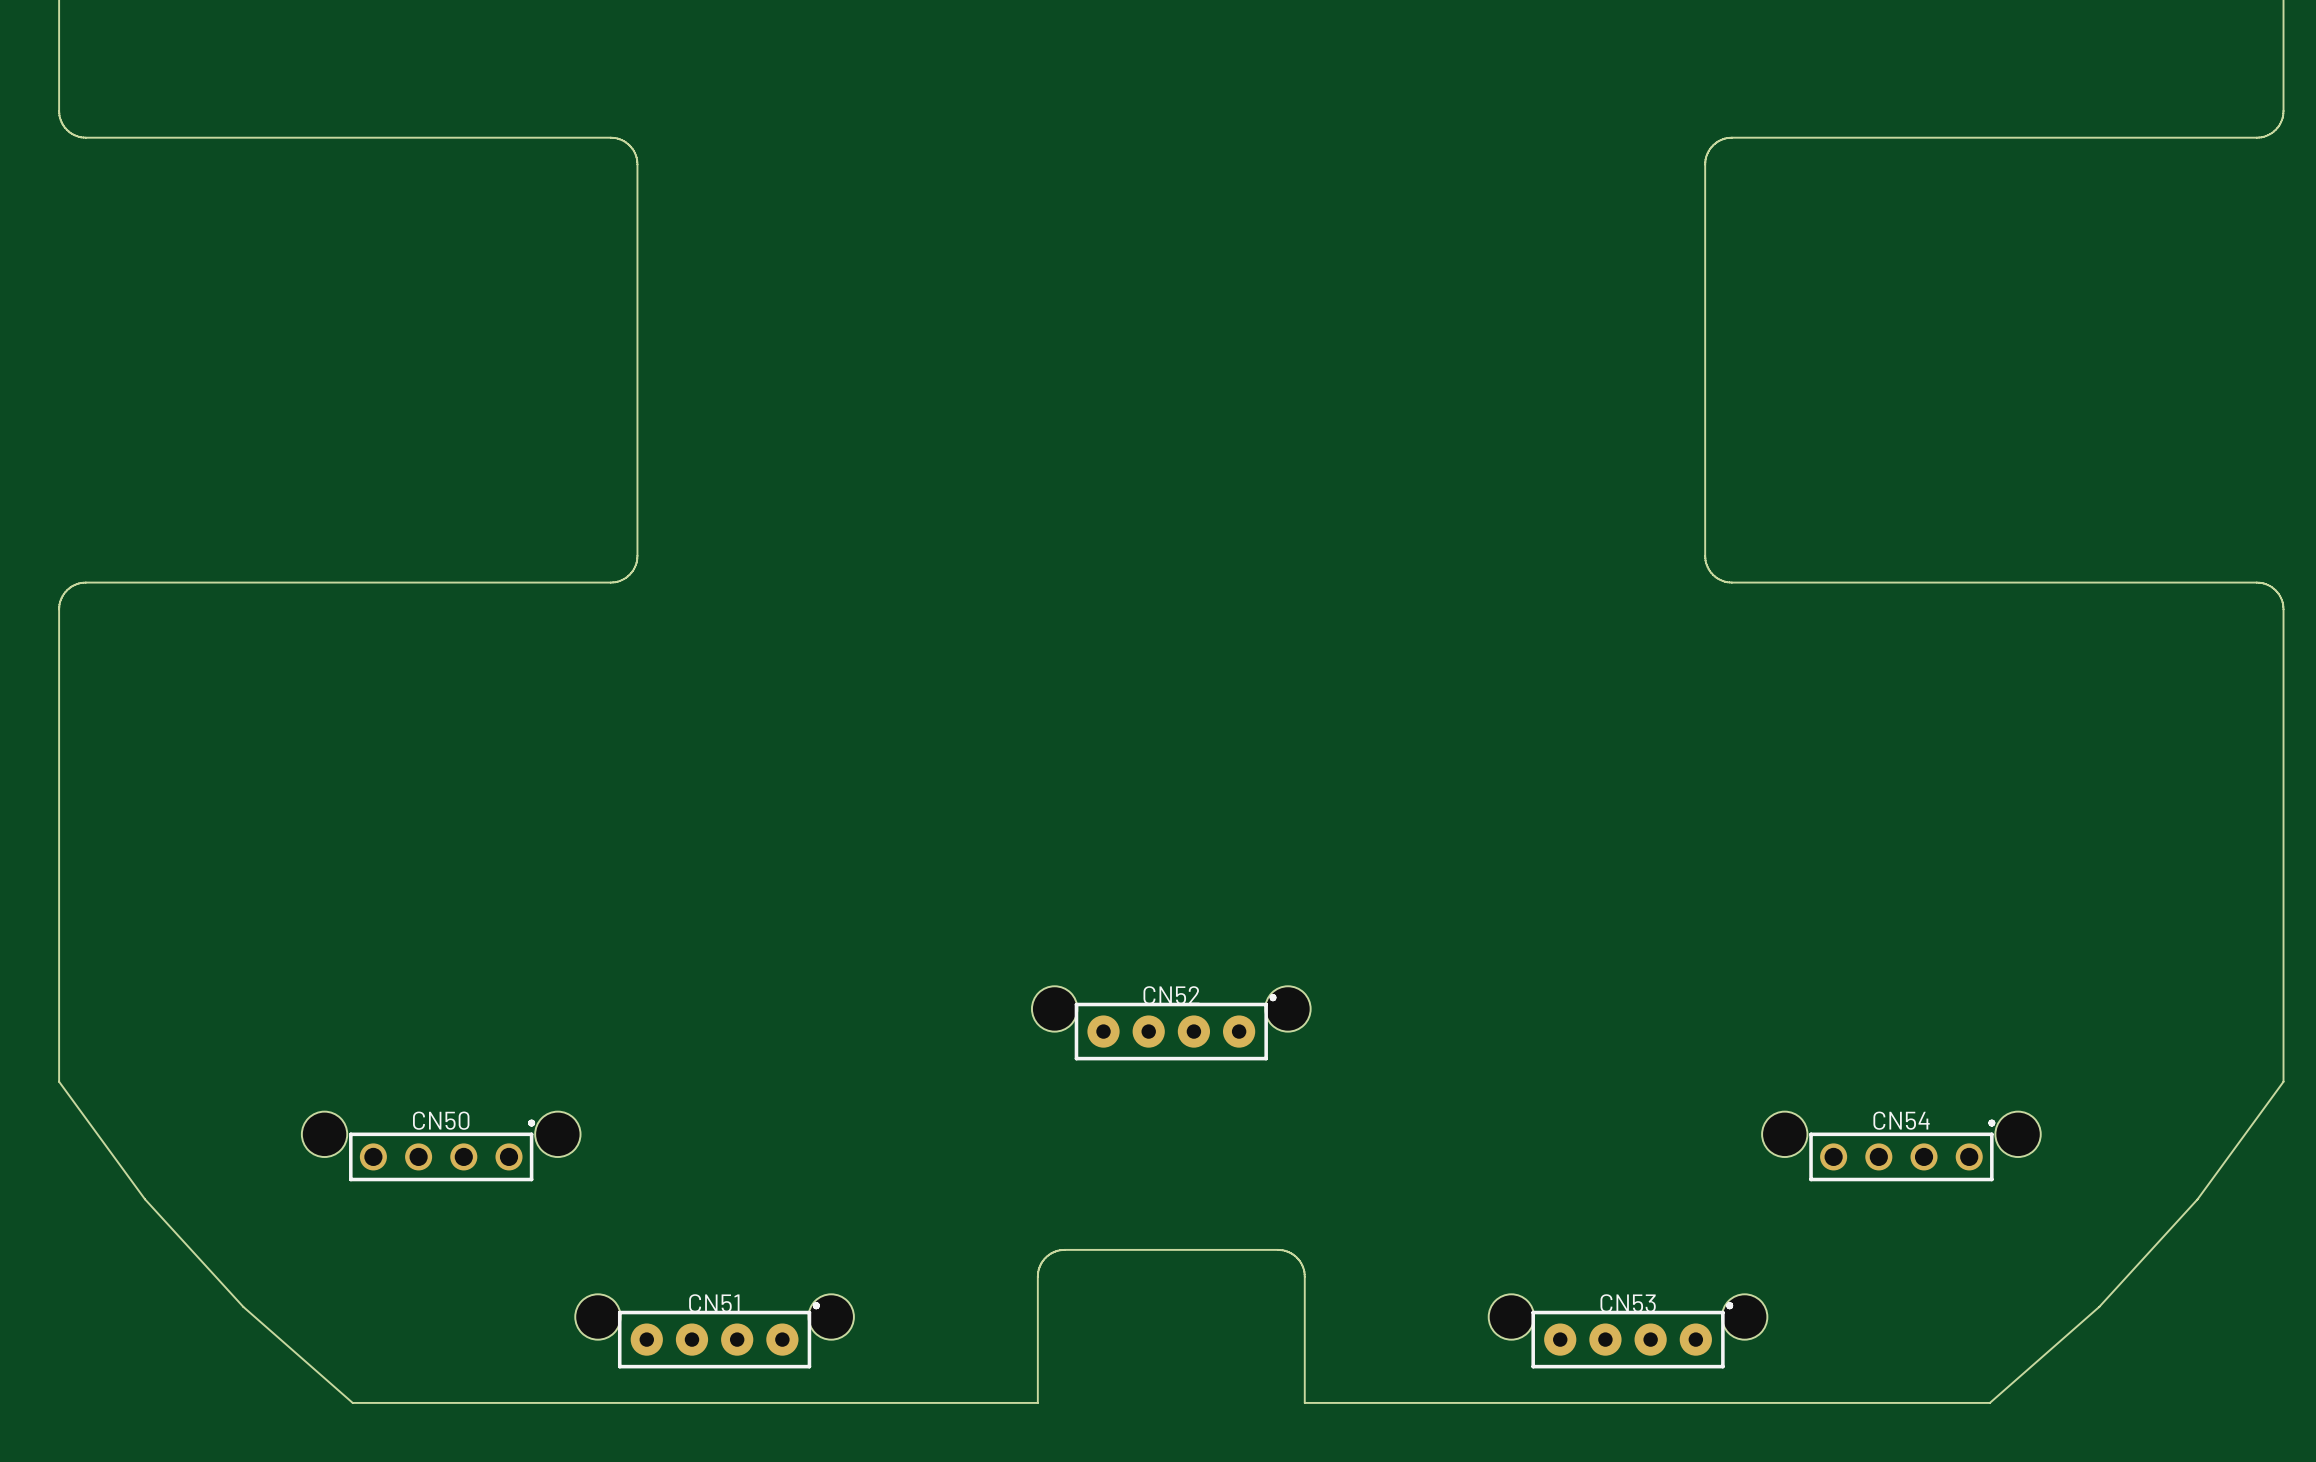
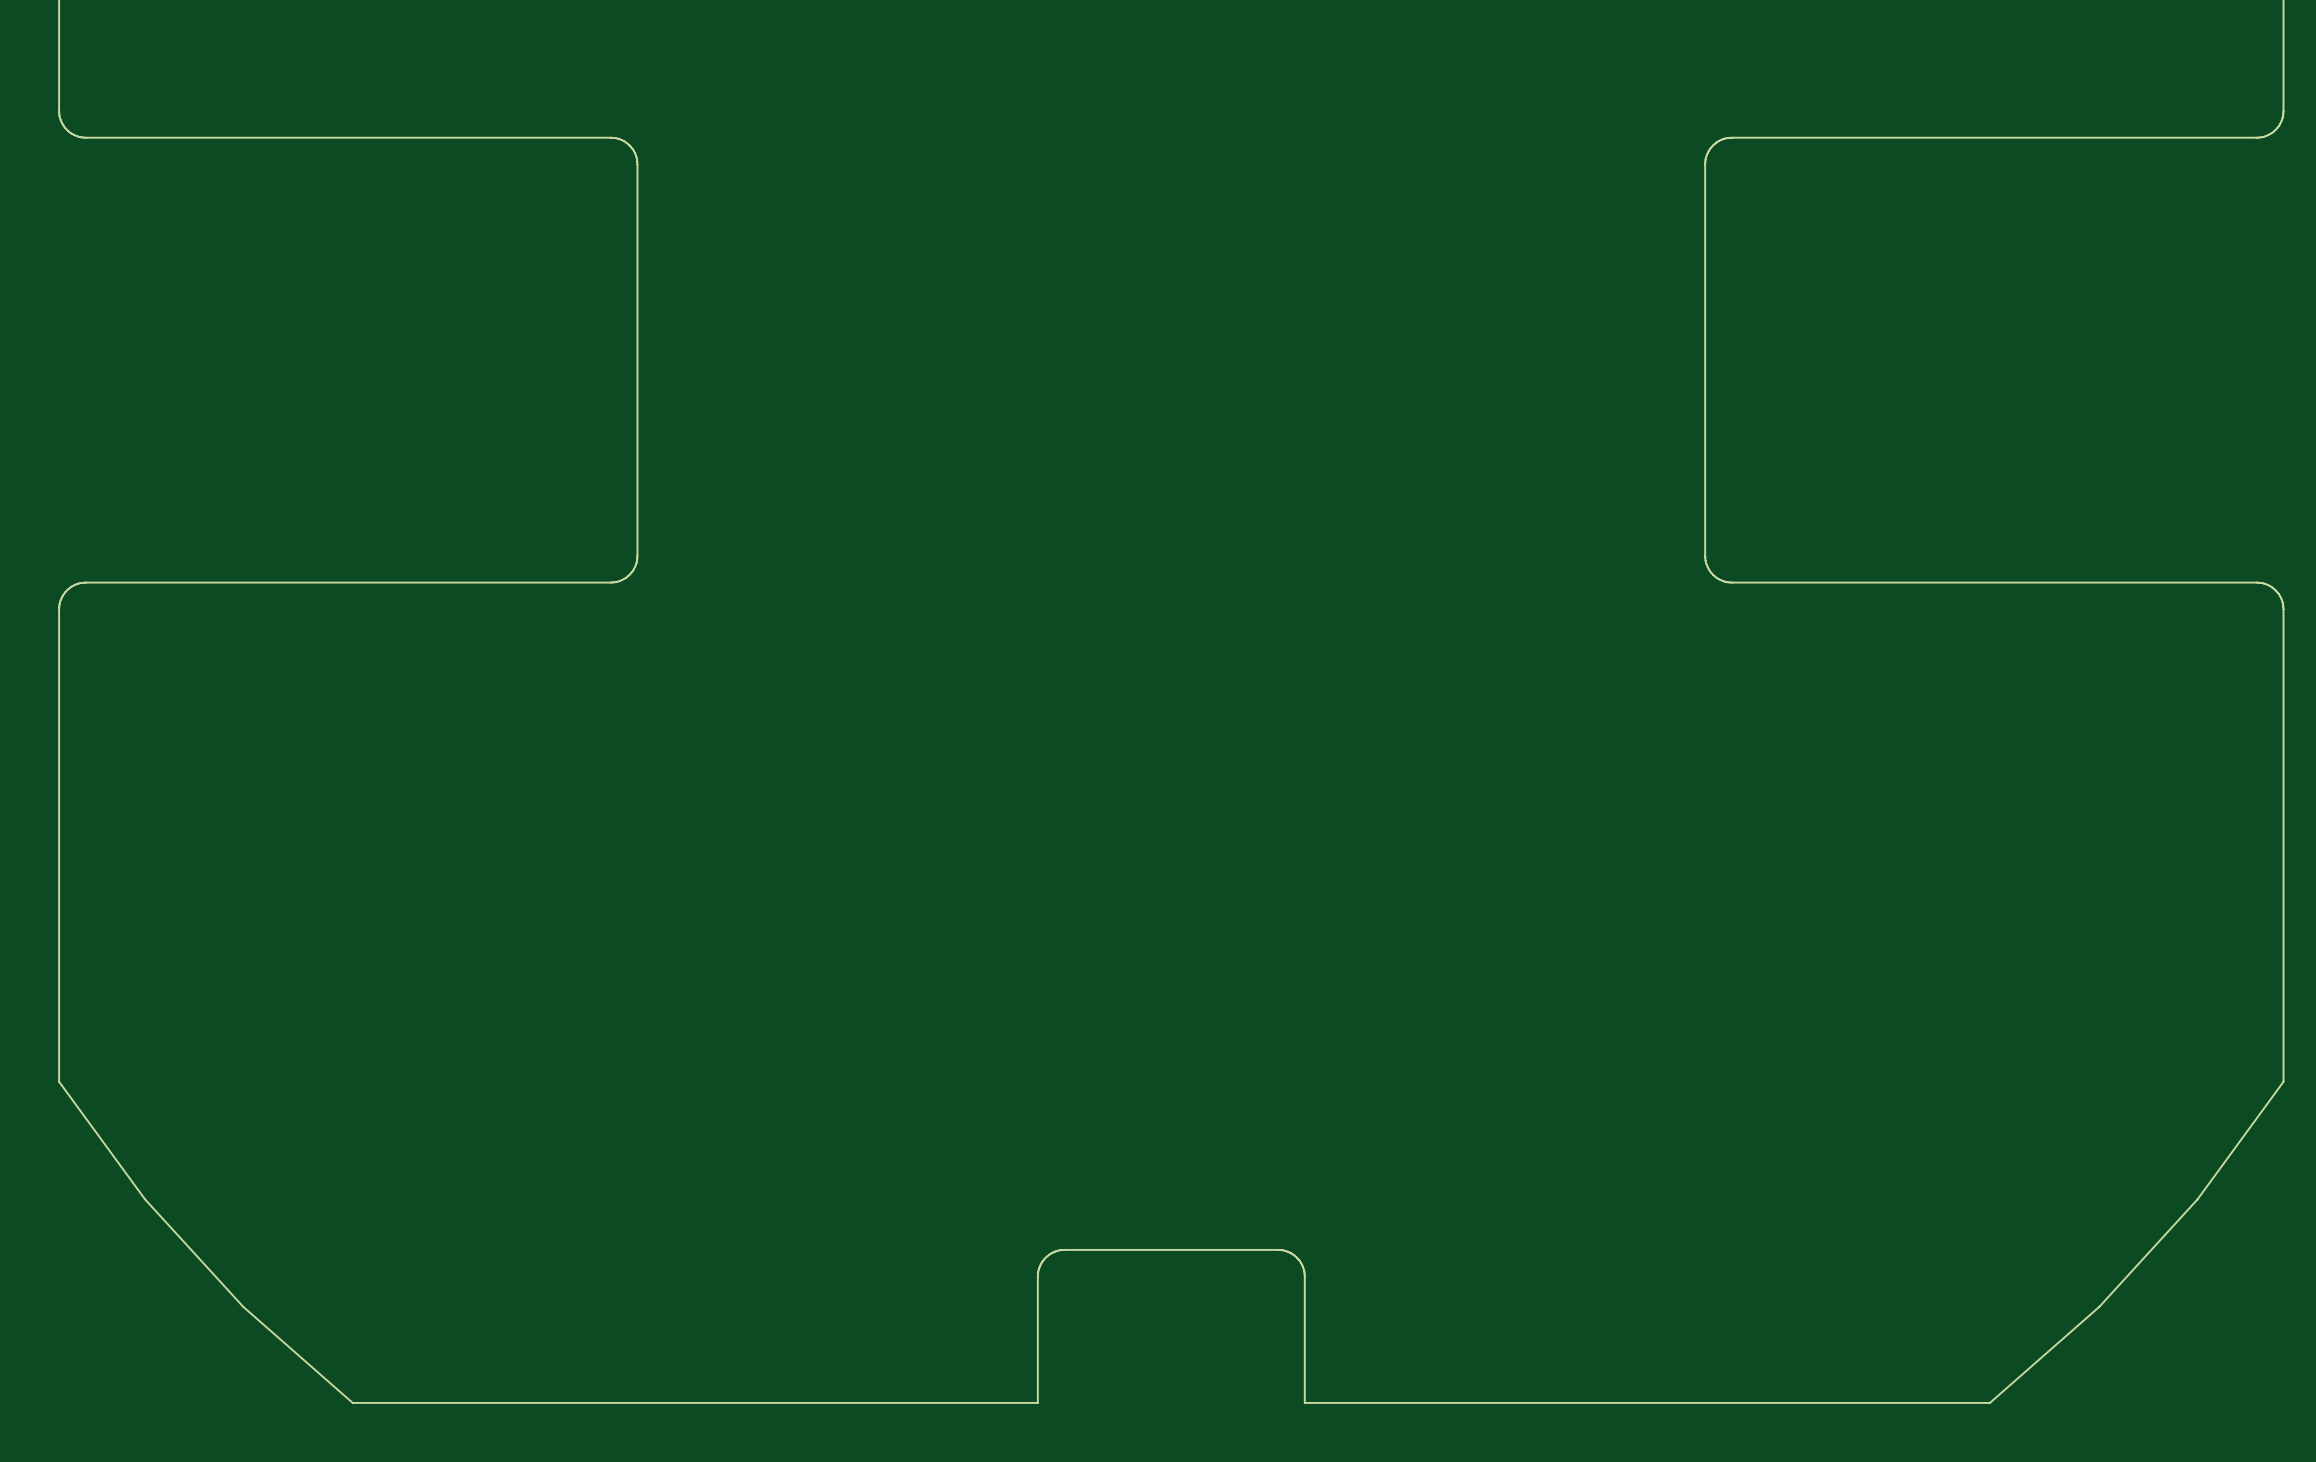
CN52: (1171, 1023) -> none
CN50: (441, 1146) -> none
CN54: (1901, 1146) -> none
CN51: (714, 1331) -> none
CN53: (1628, 1331) -> none

